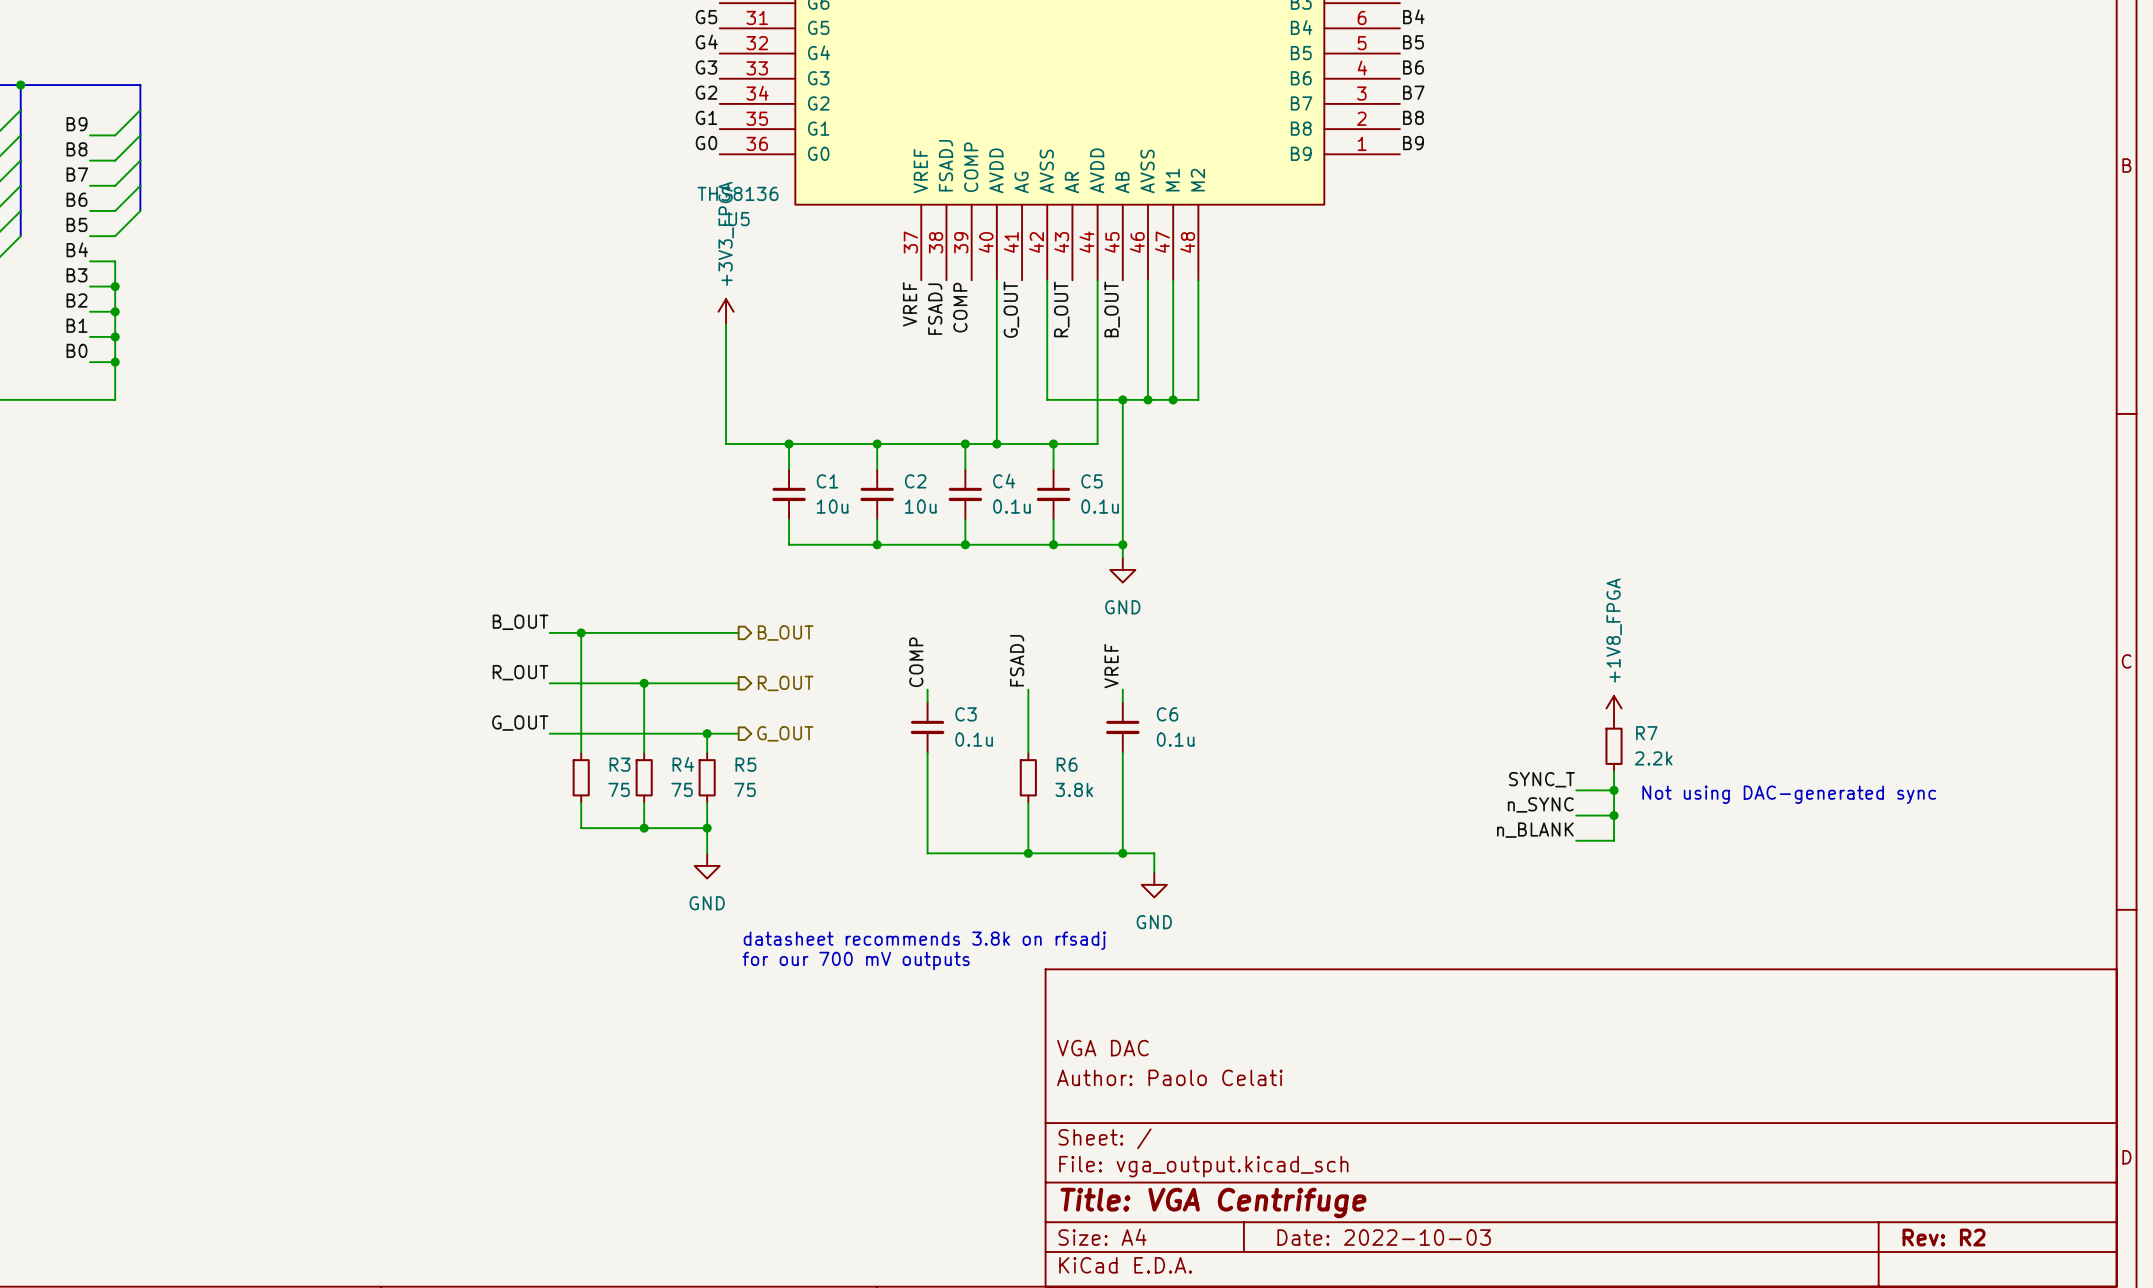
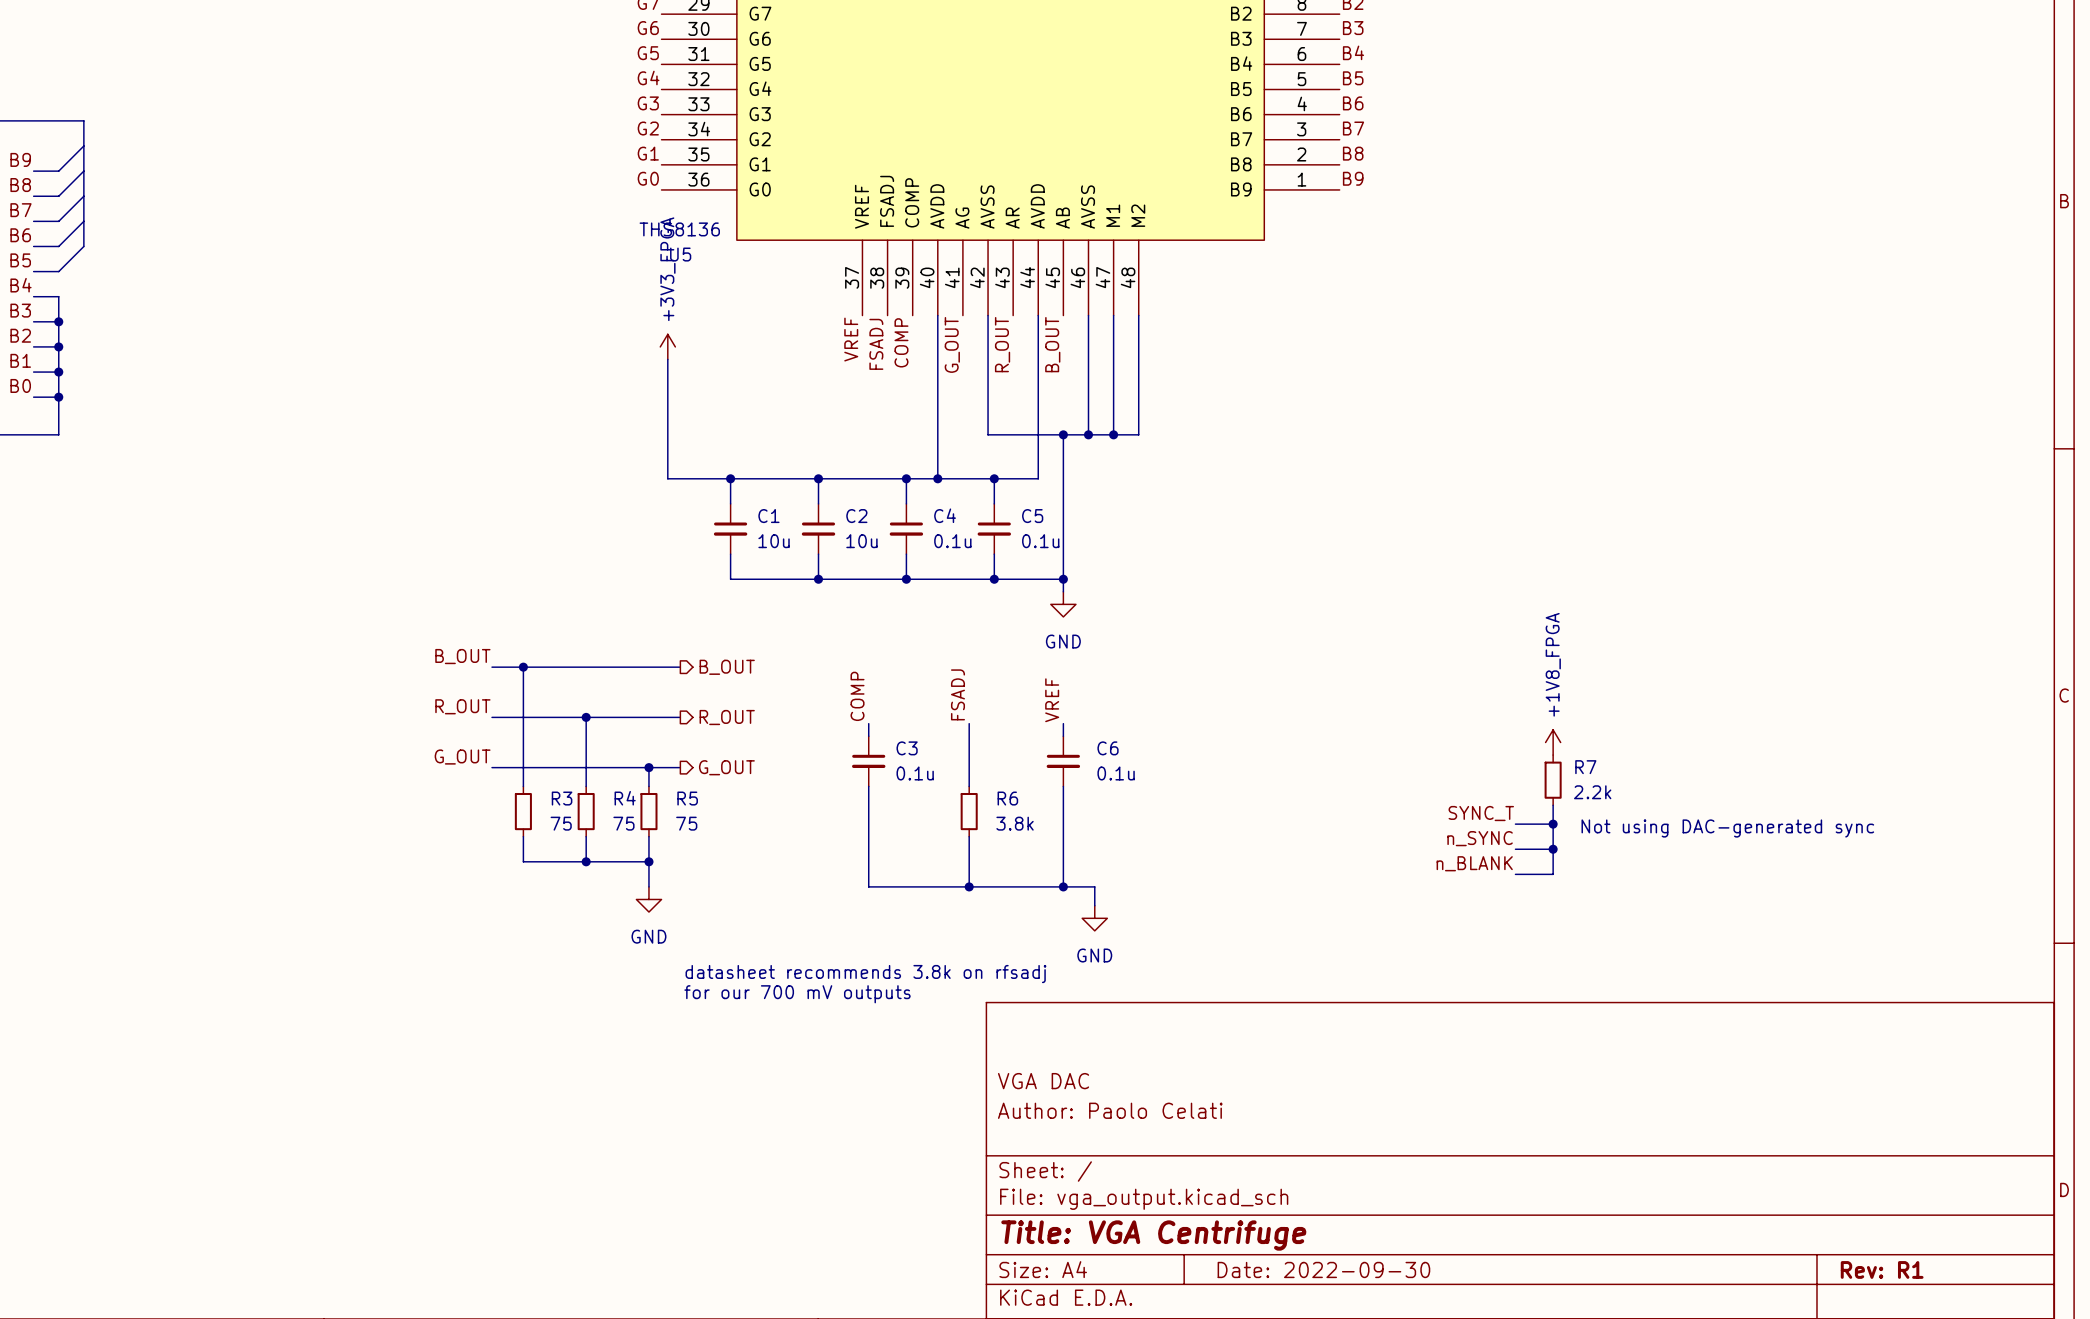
title block: Date: 2022-10-03 (1384, 1237) -> Date: 2022-09-30 (1323, 1269)
title block: Rev: R2 (1944, 1237) -> Rev: R1 (1882, 1269)

